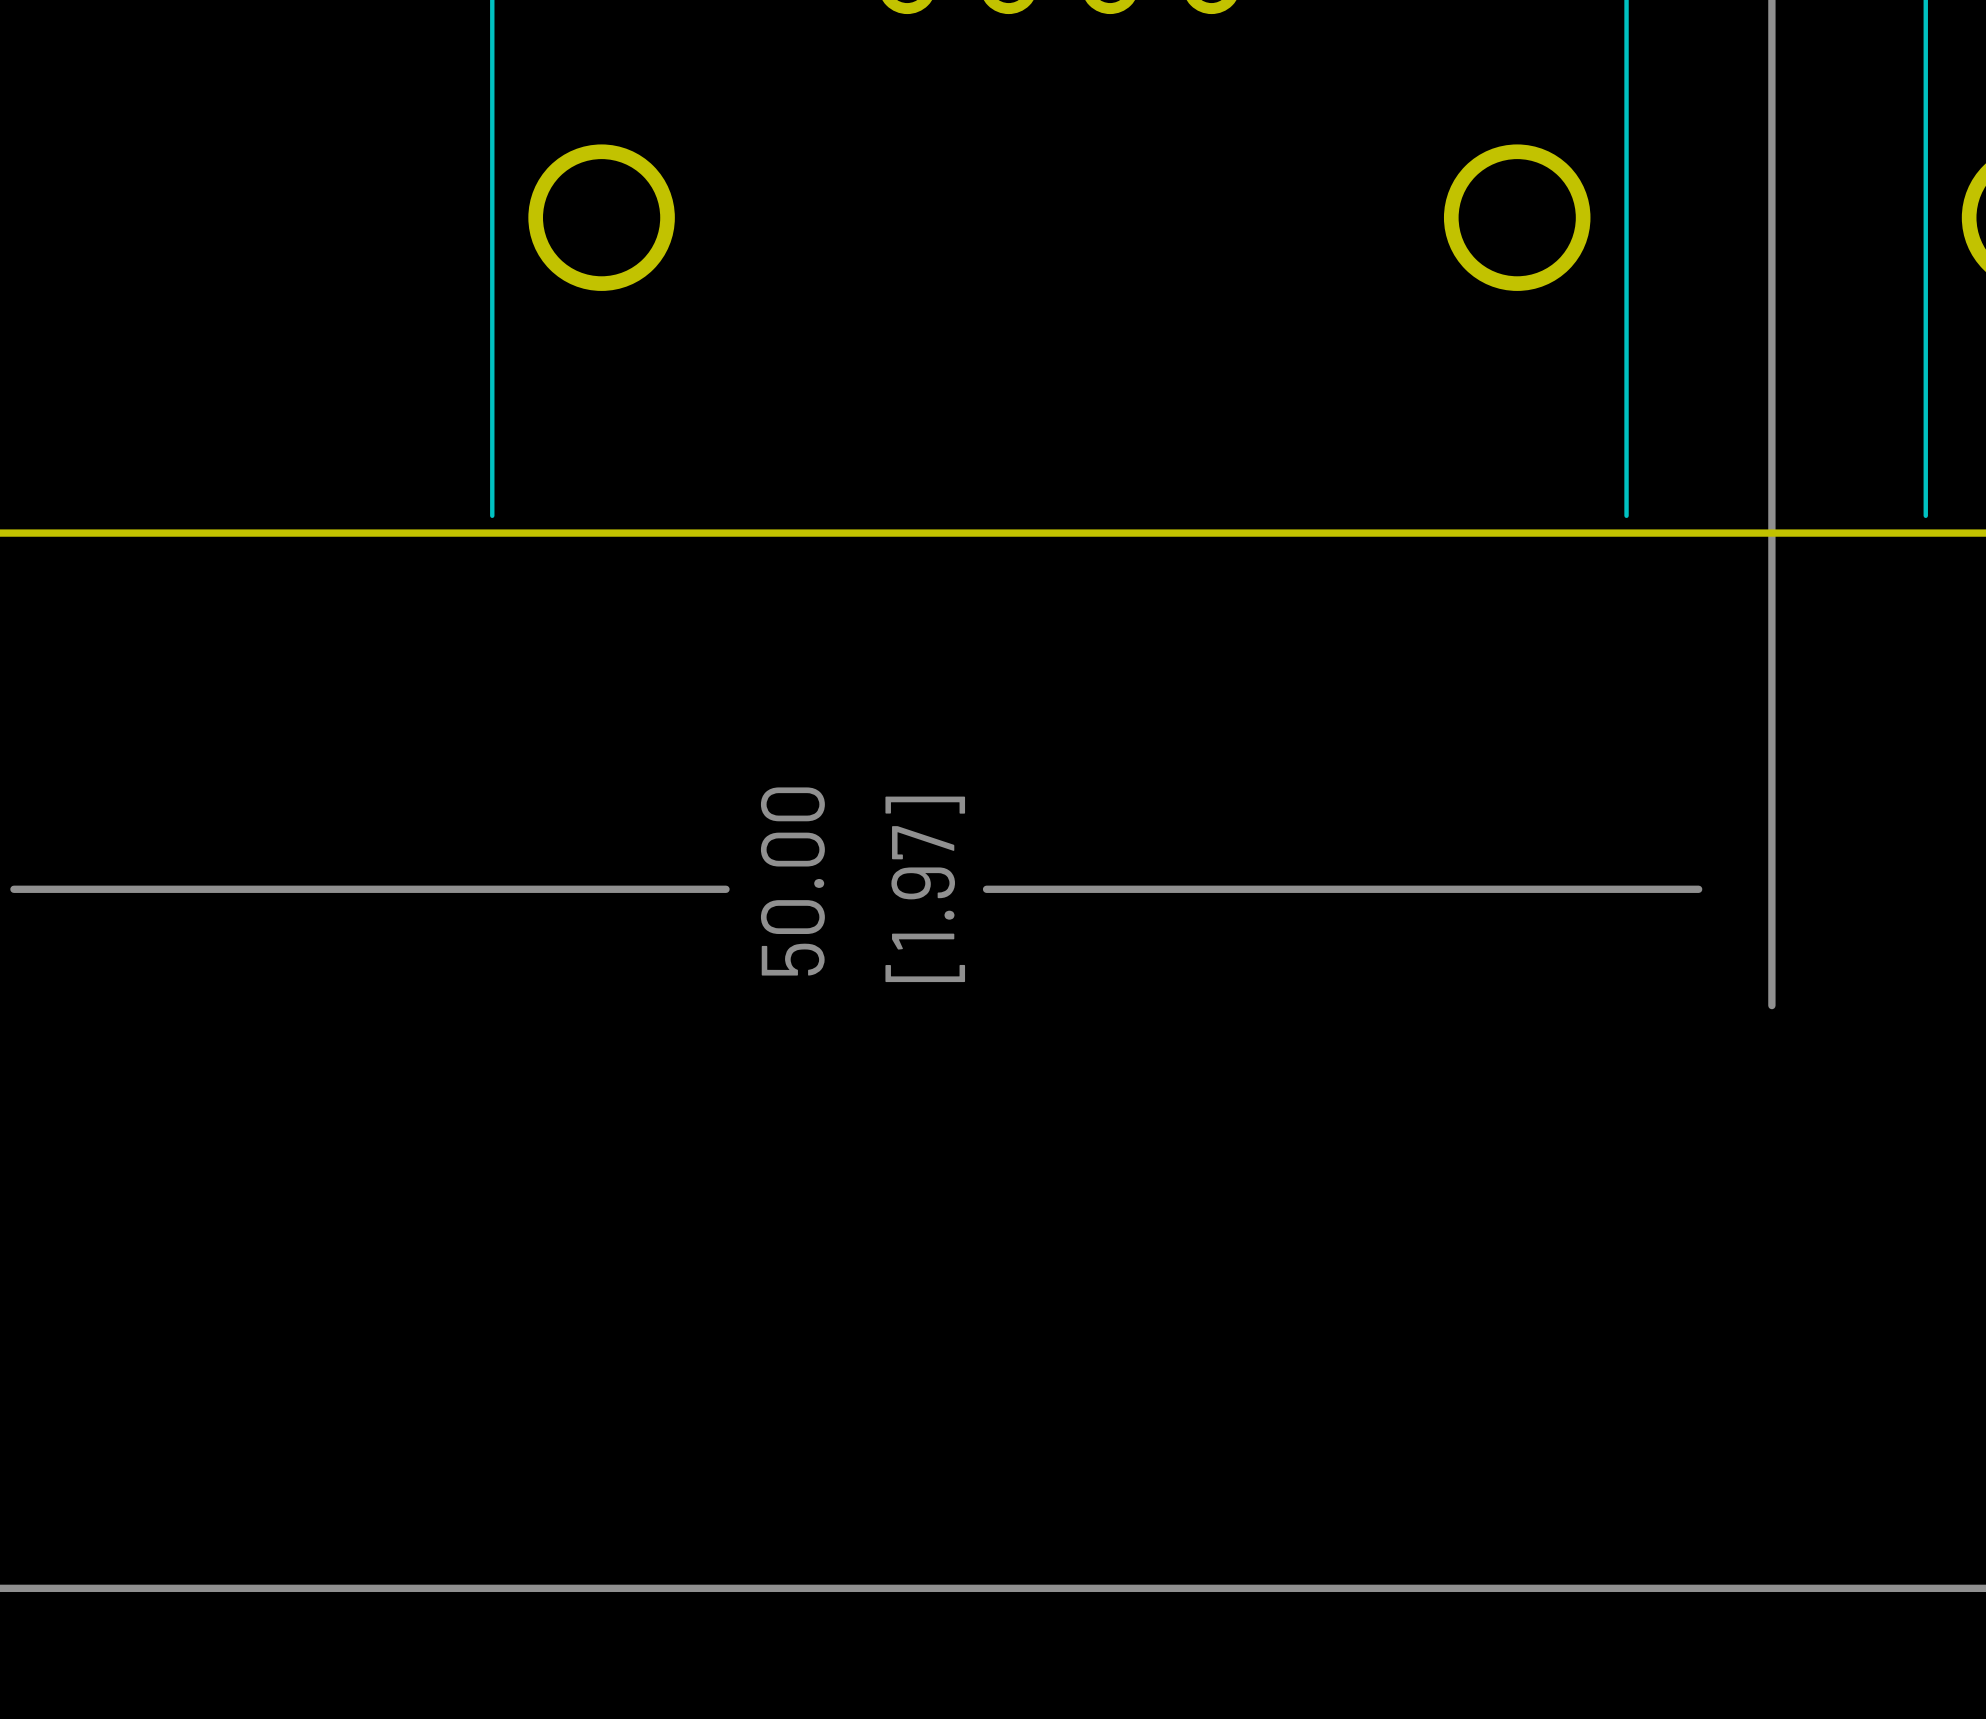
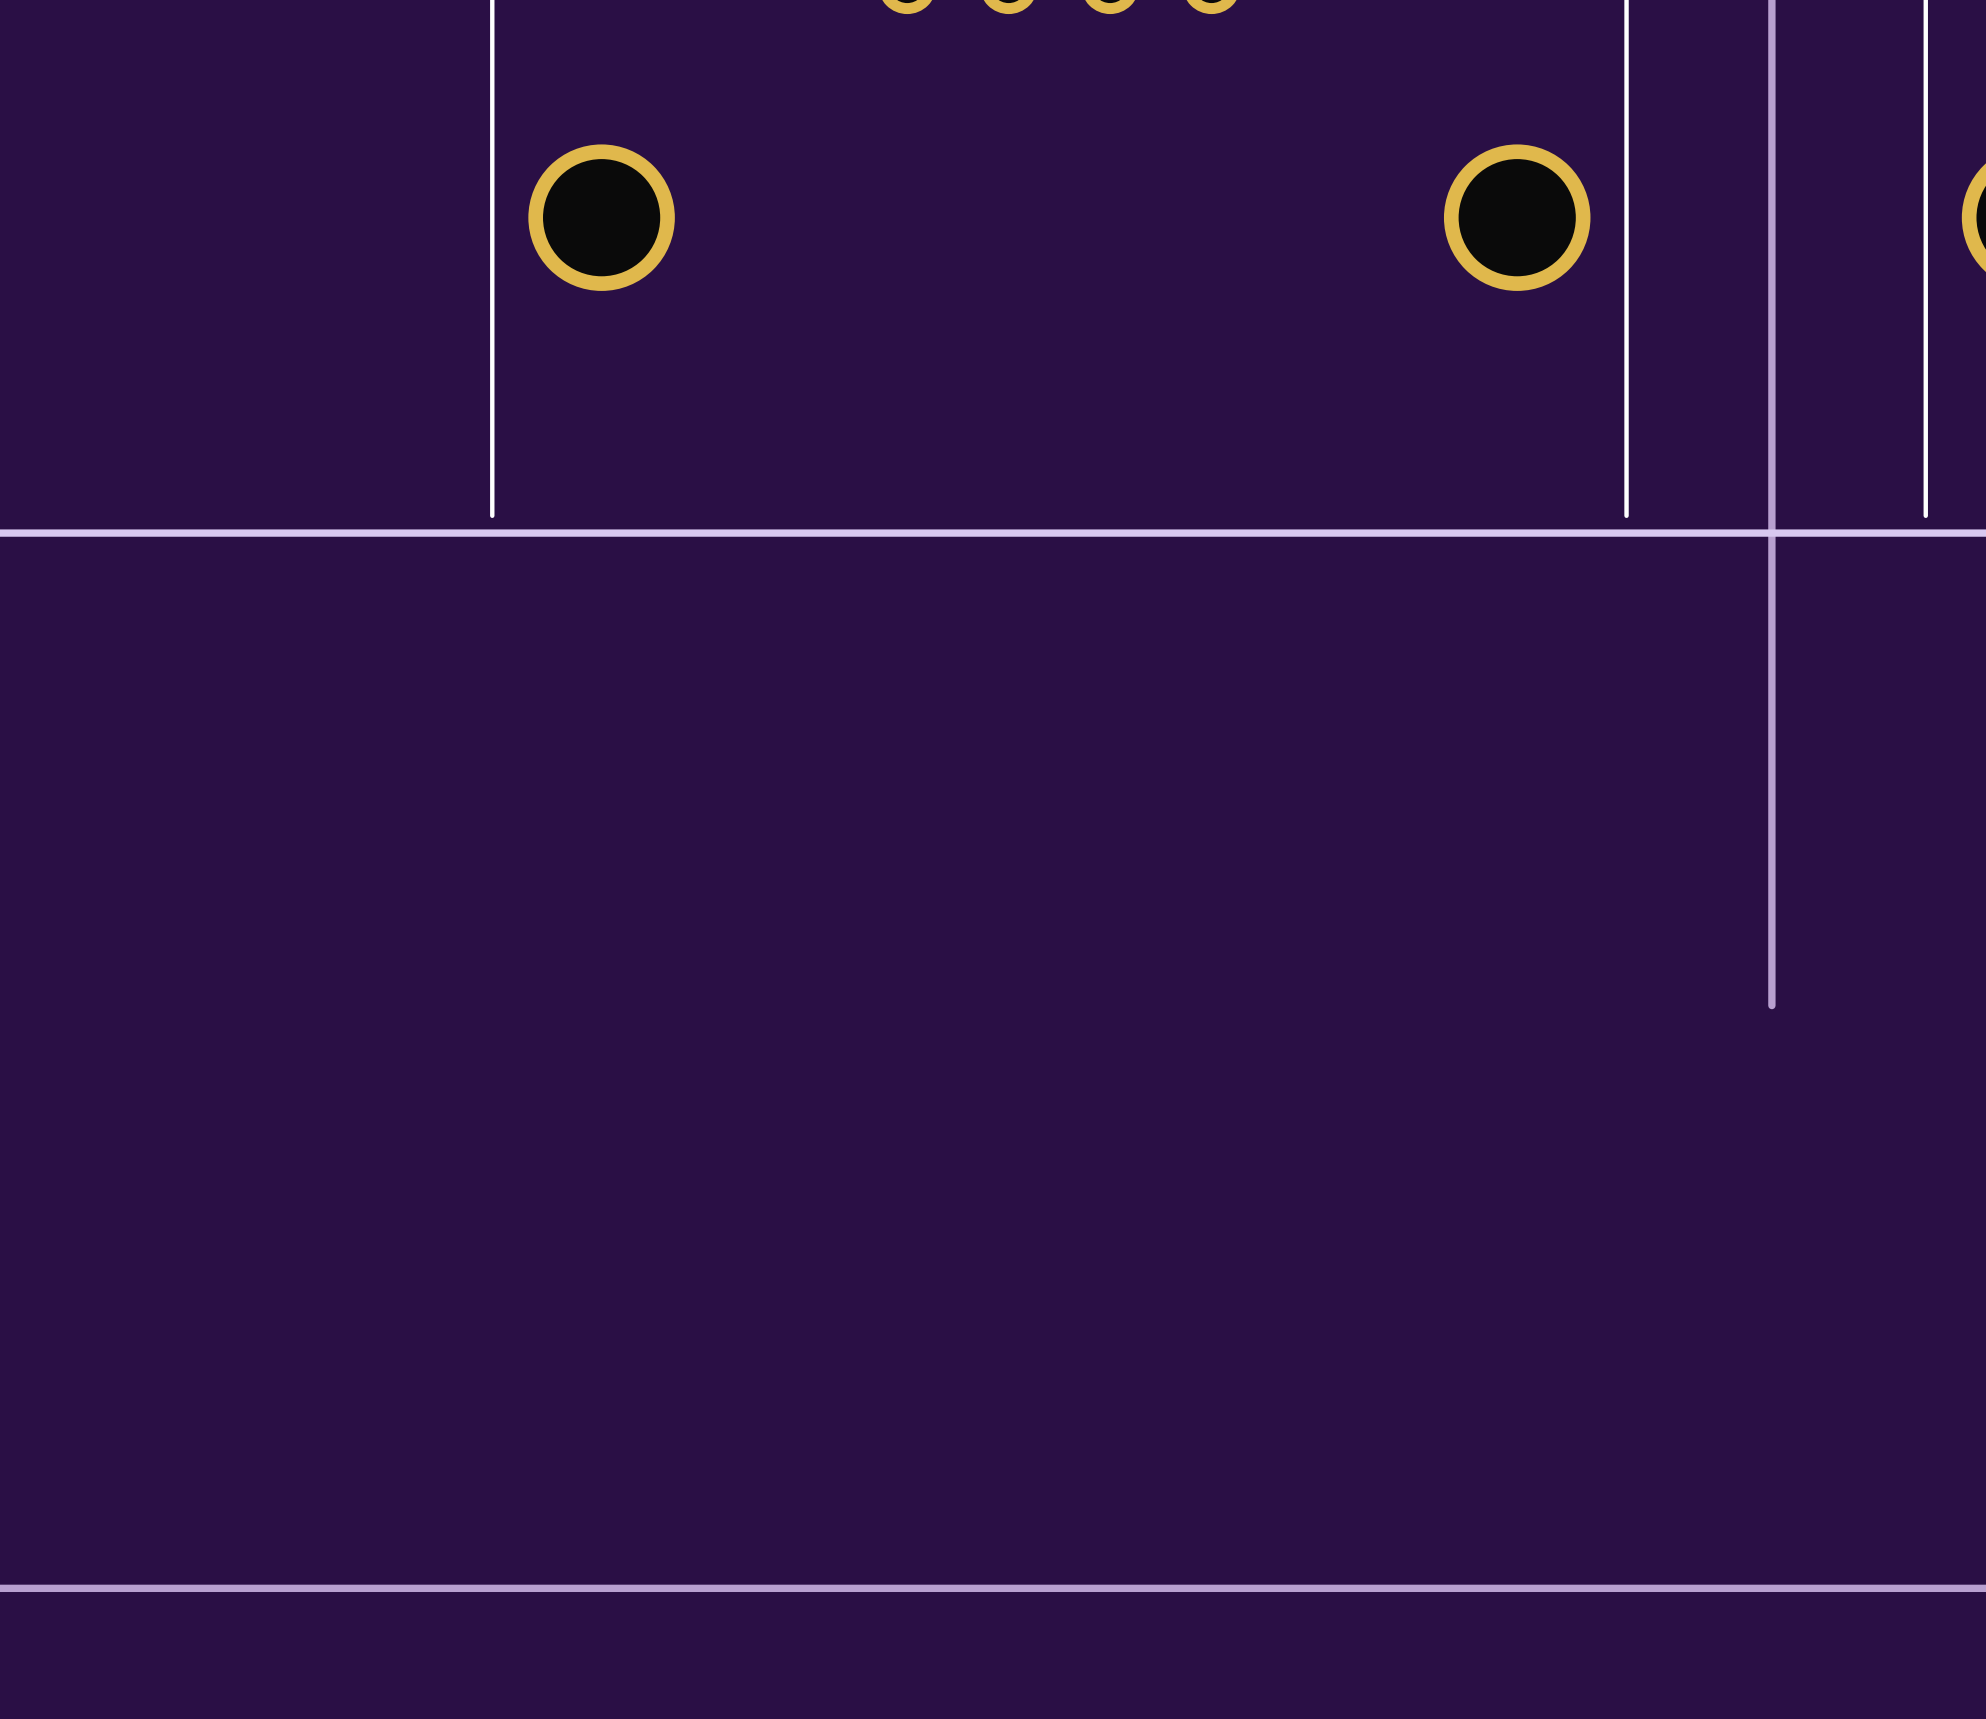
text: 50.00 (792, 881) -> none
line: (13, 889) (726, 889) -> none
text: [1.97] (925, 889) -> none
line: (986, 889) (1698, 889) -> none

